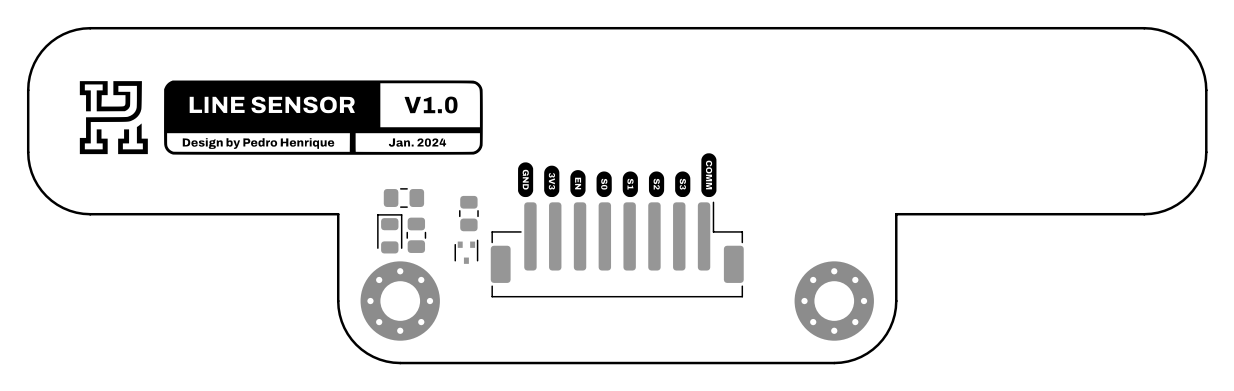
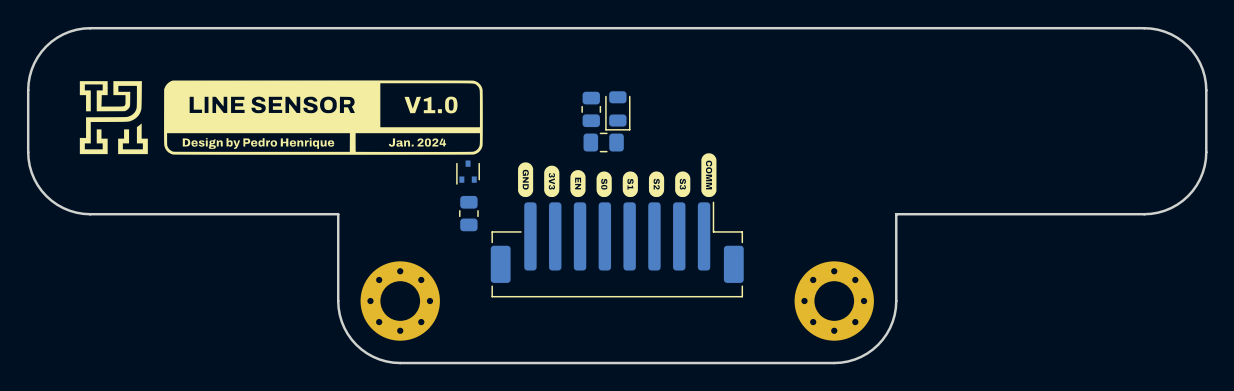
part position: (403, 198) -> (603, 142)
part rotation: 0° (389, 233) -> 180° (617, 110)
part position: (389, 233) -> (617, 110)
part position: (416, 235) -> (591, 109)
part rotation: 0° (466, 251) -> 180° (468, 172)
part position: (466, 251) -> (468, 172)

